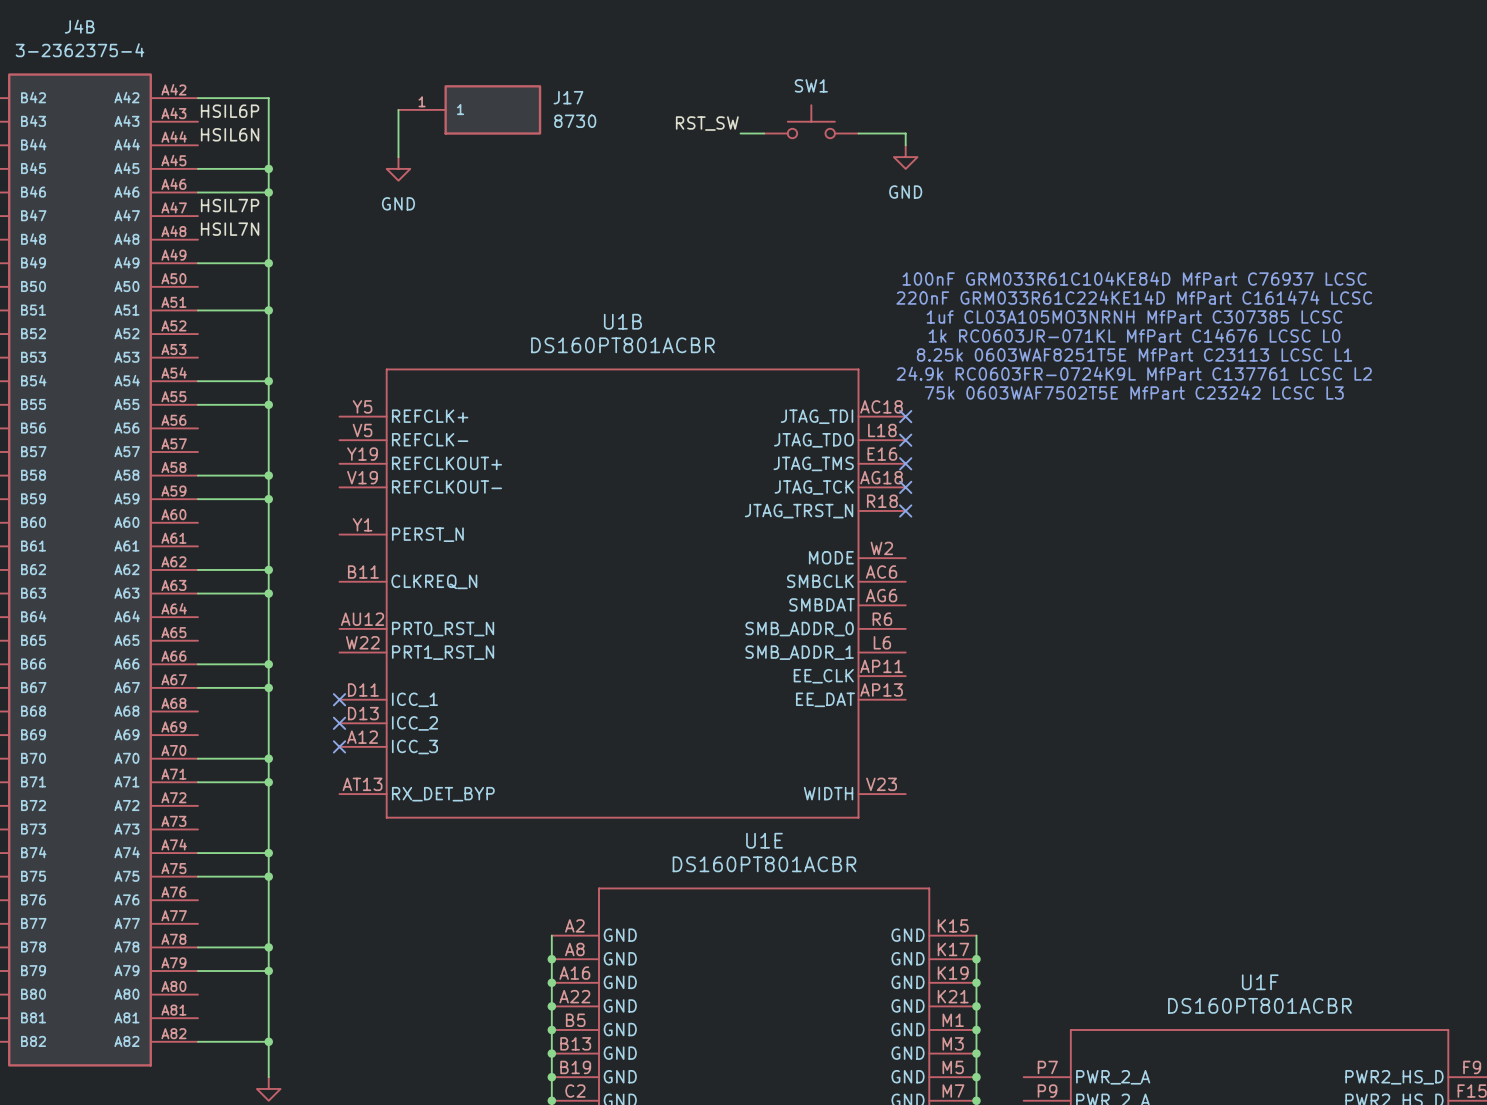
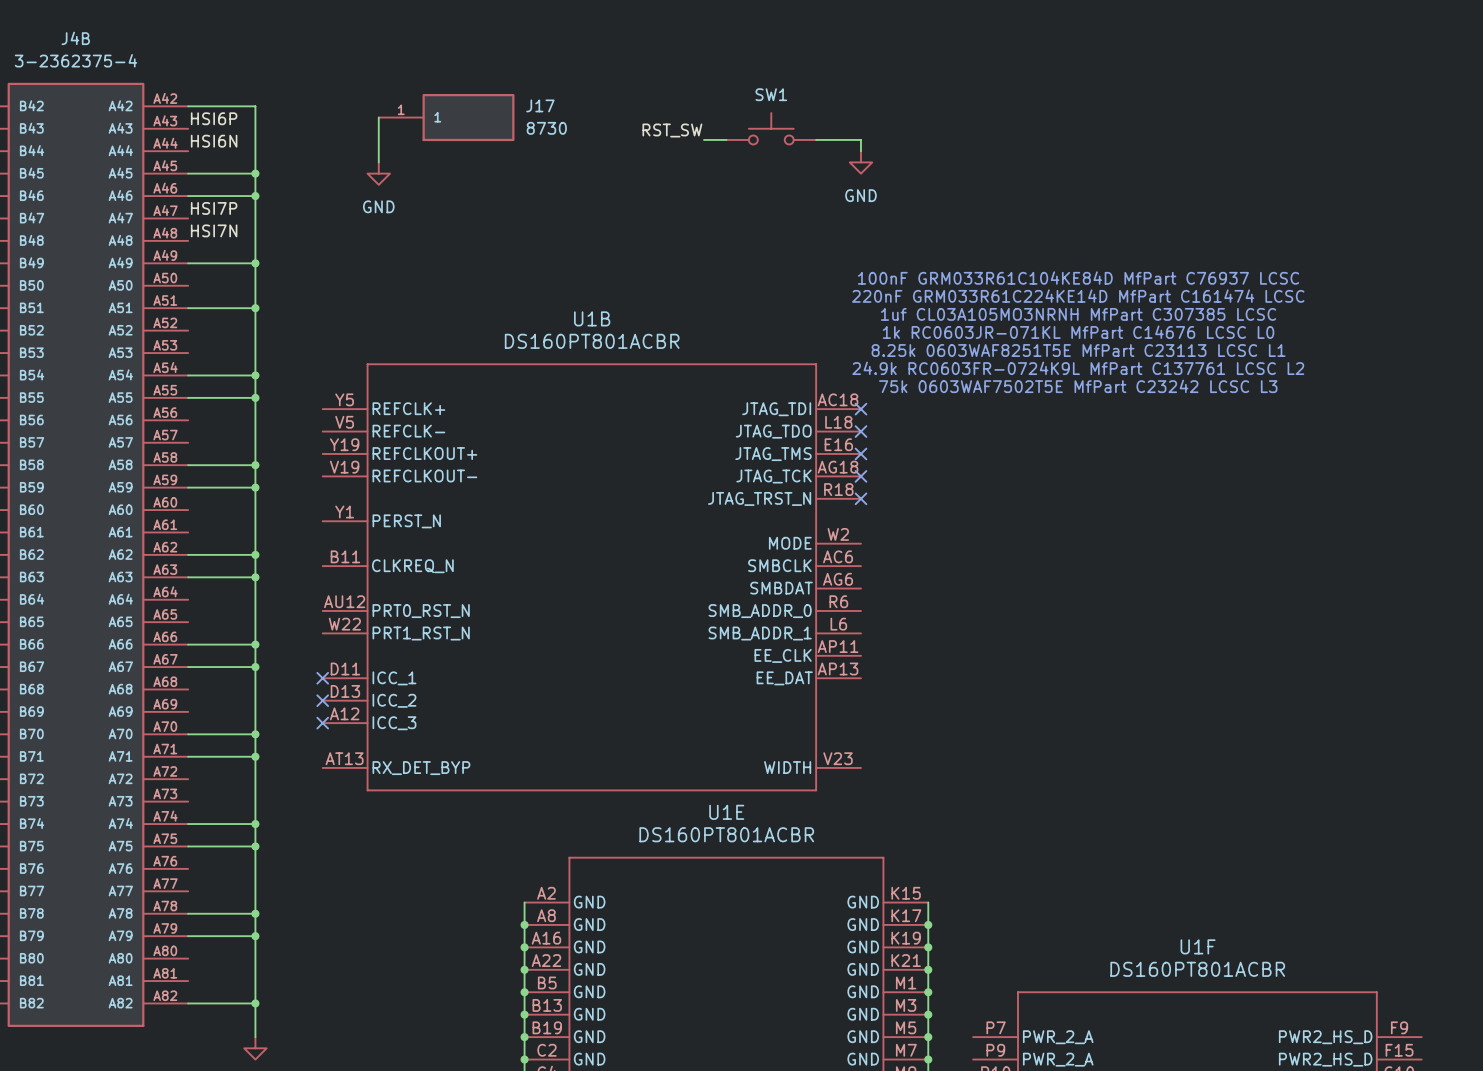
label: HSIL6P (230, 111) -> HSI6P (214, 118)
label: HSIL6N (230, 134) -> HSI6N (214, 141)
label: HSIL7P (230, 205) -> HSI7P (214, 208)
label: HSIL7N (230, 229) -> HSI7N (214, 230)

